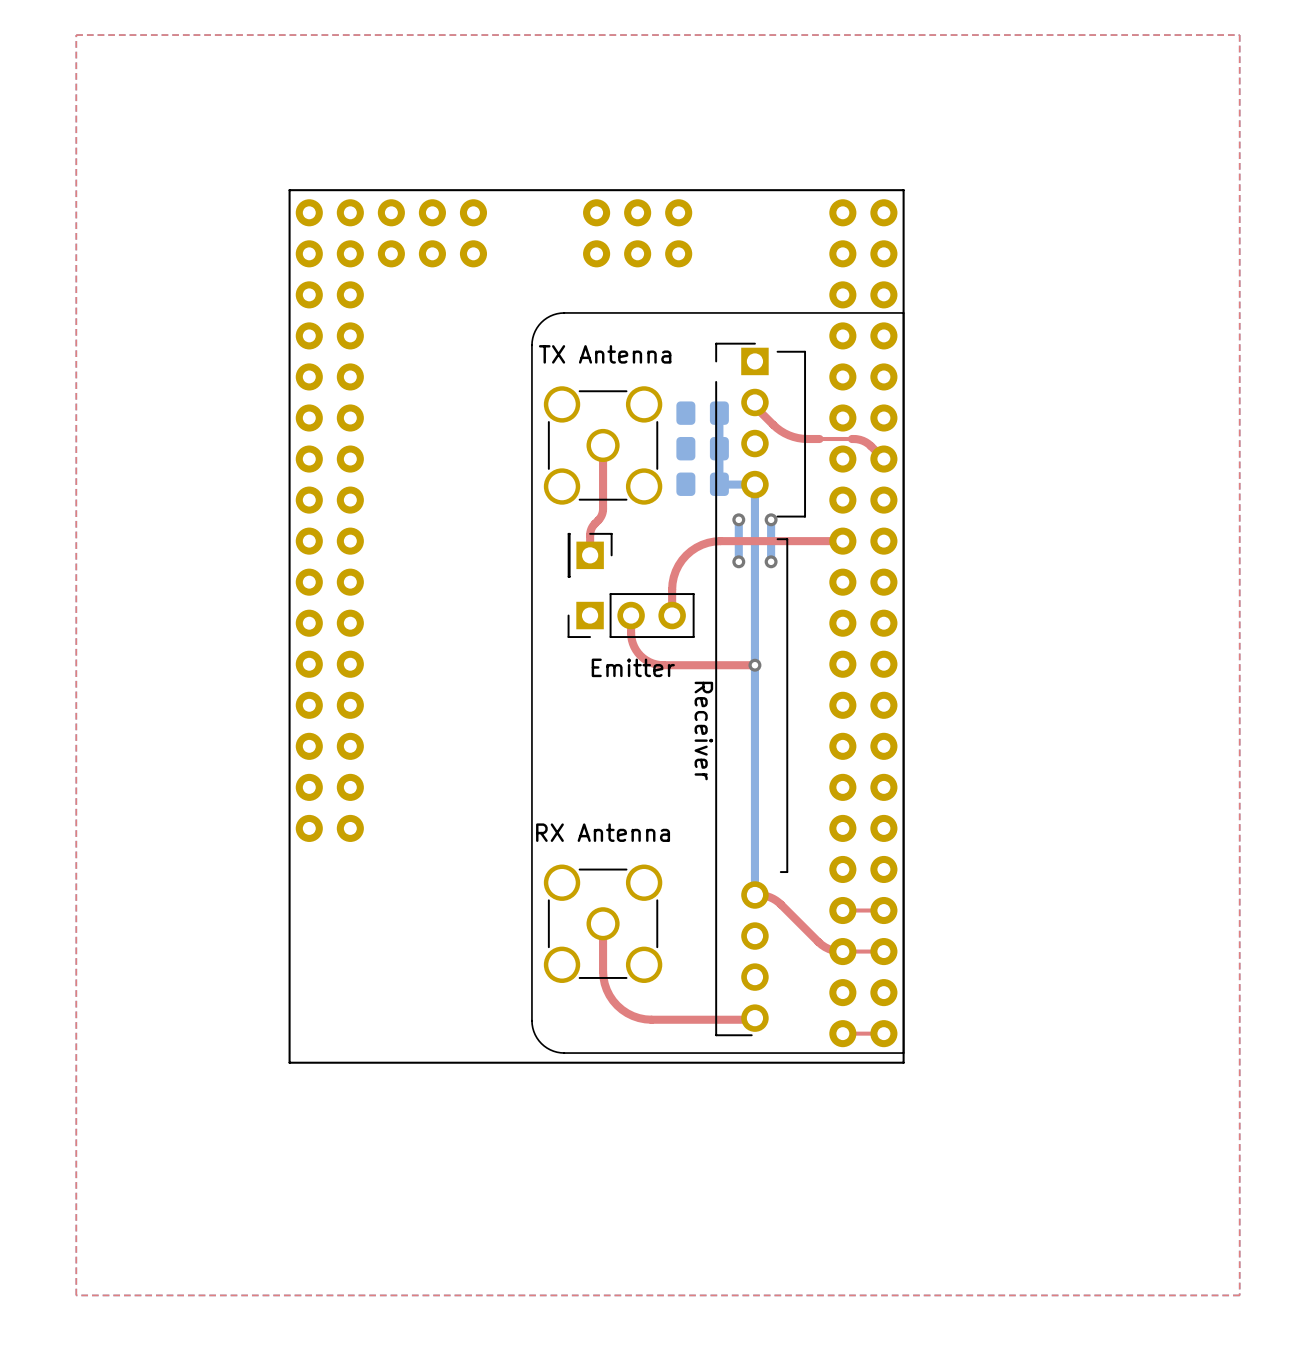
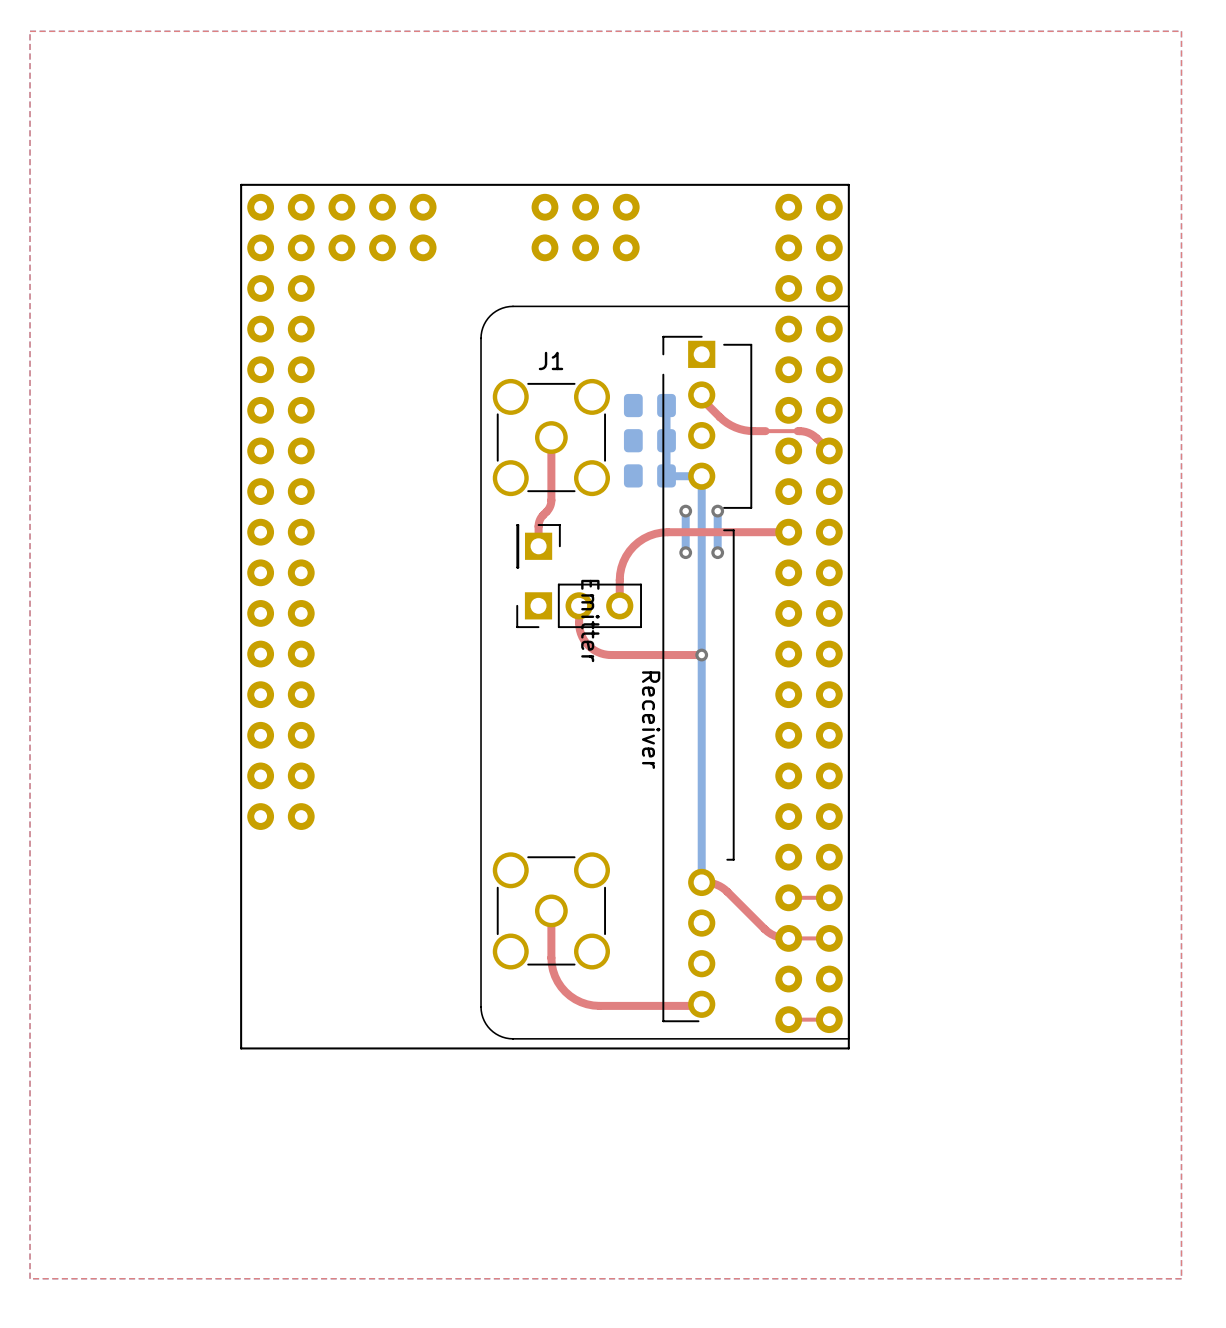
text: TX Antenna (605, 354) -> none
J1 name: none -> J1 (551, 360)
text rotation: 0° (633, 667) -> 90° clockwise (590, 620)
text: RX Antenna (603, 832) -> none

